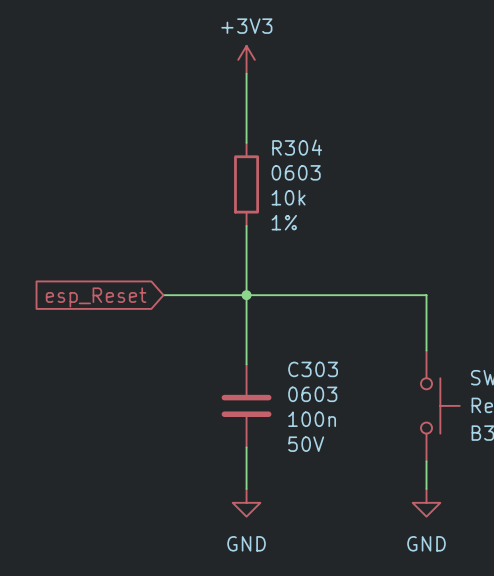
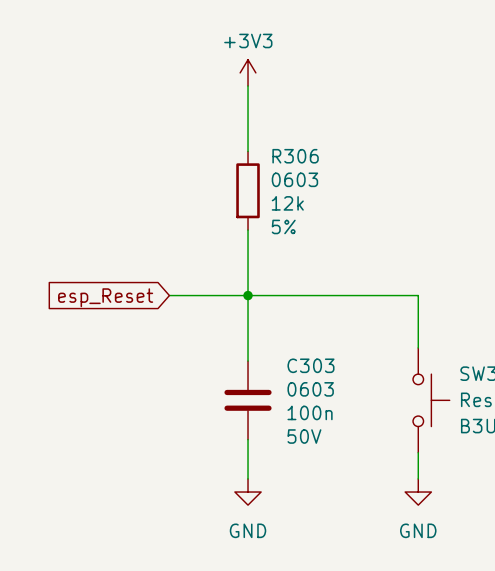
R304 name: R304 (297, 147) -> R306 (295, 156)
R304 value: 10k (288, 197) -> 12k (287, 203)
R304 text: 1% (284, 222) -> 5% (283, 226)

